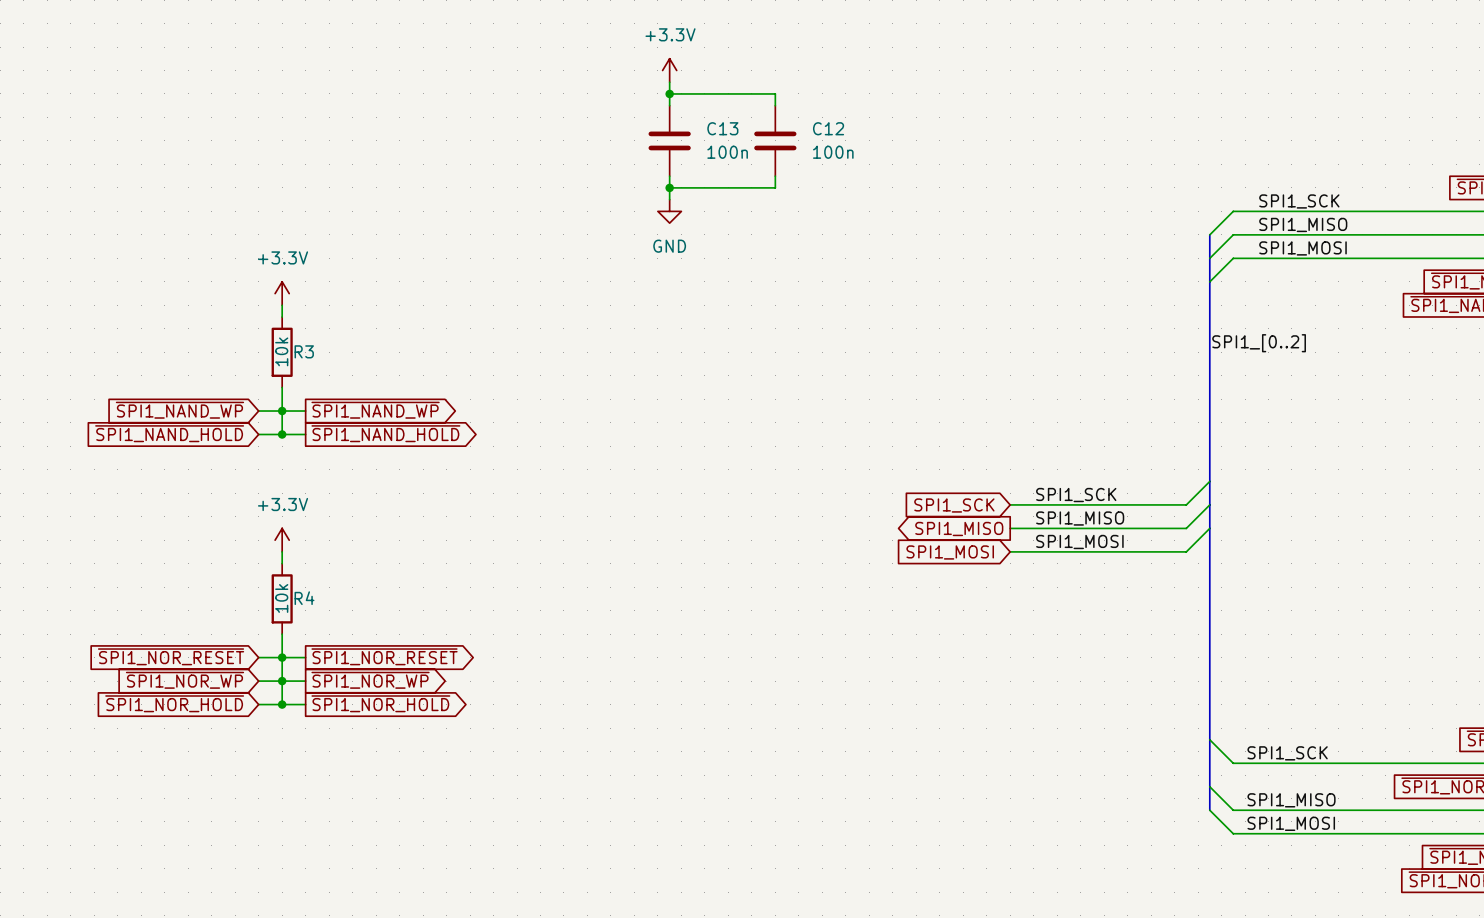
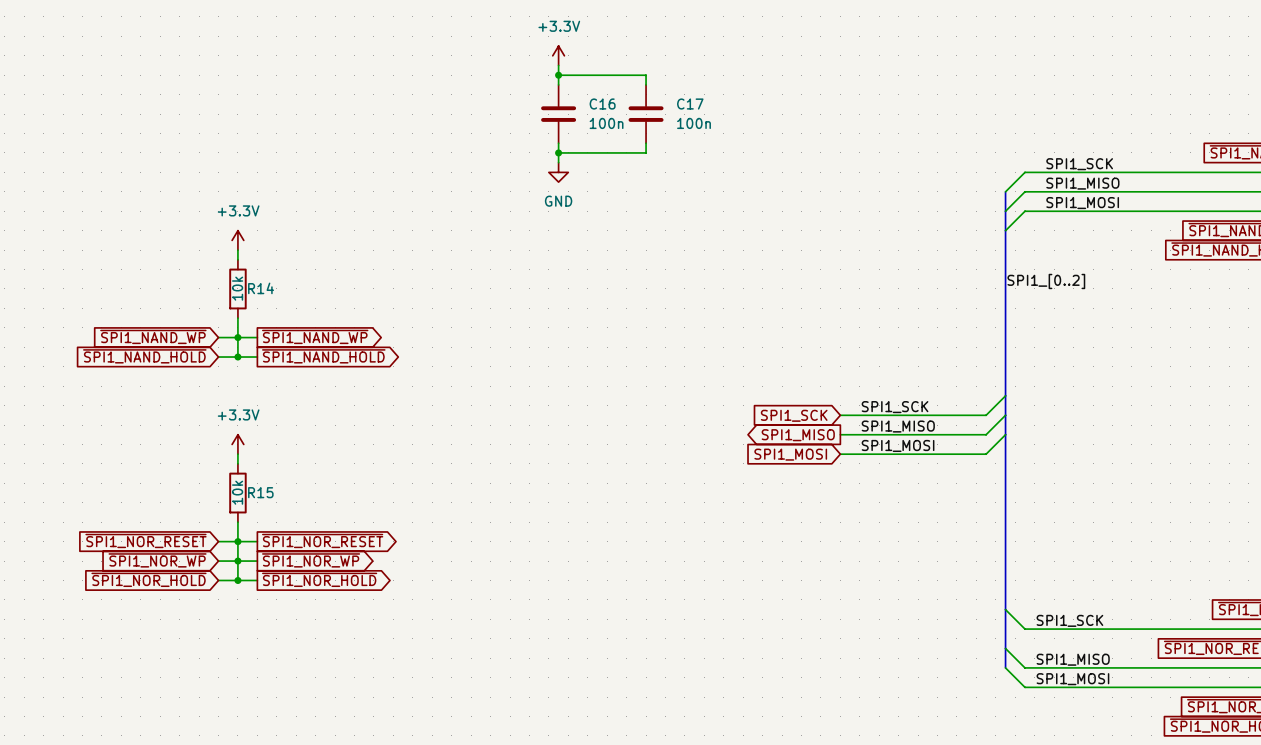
C13 name: C13 (722, 128) -> C16 (602, 104)
C12 name: C12 (828, 128) -> C17 (690, 104)
R3 name: R3 (304, 351) -> R14 (261, 288)
R4 name: R4 (304, 598) -> R15 (260, 492)

